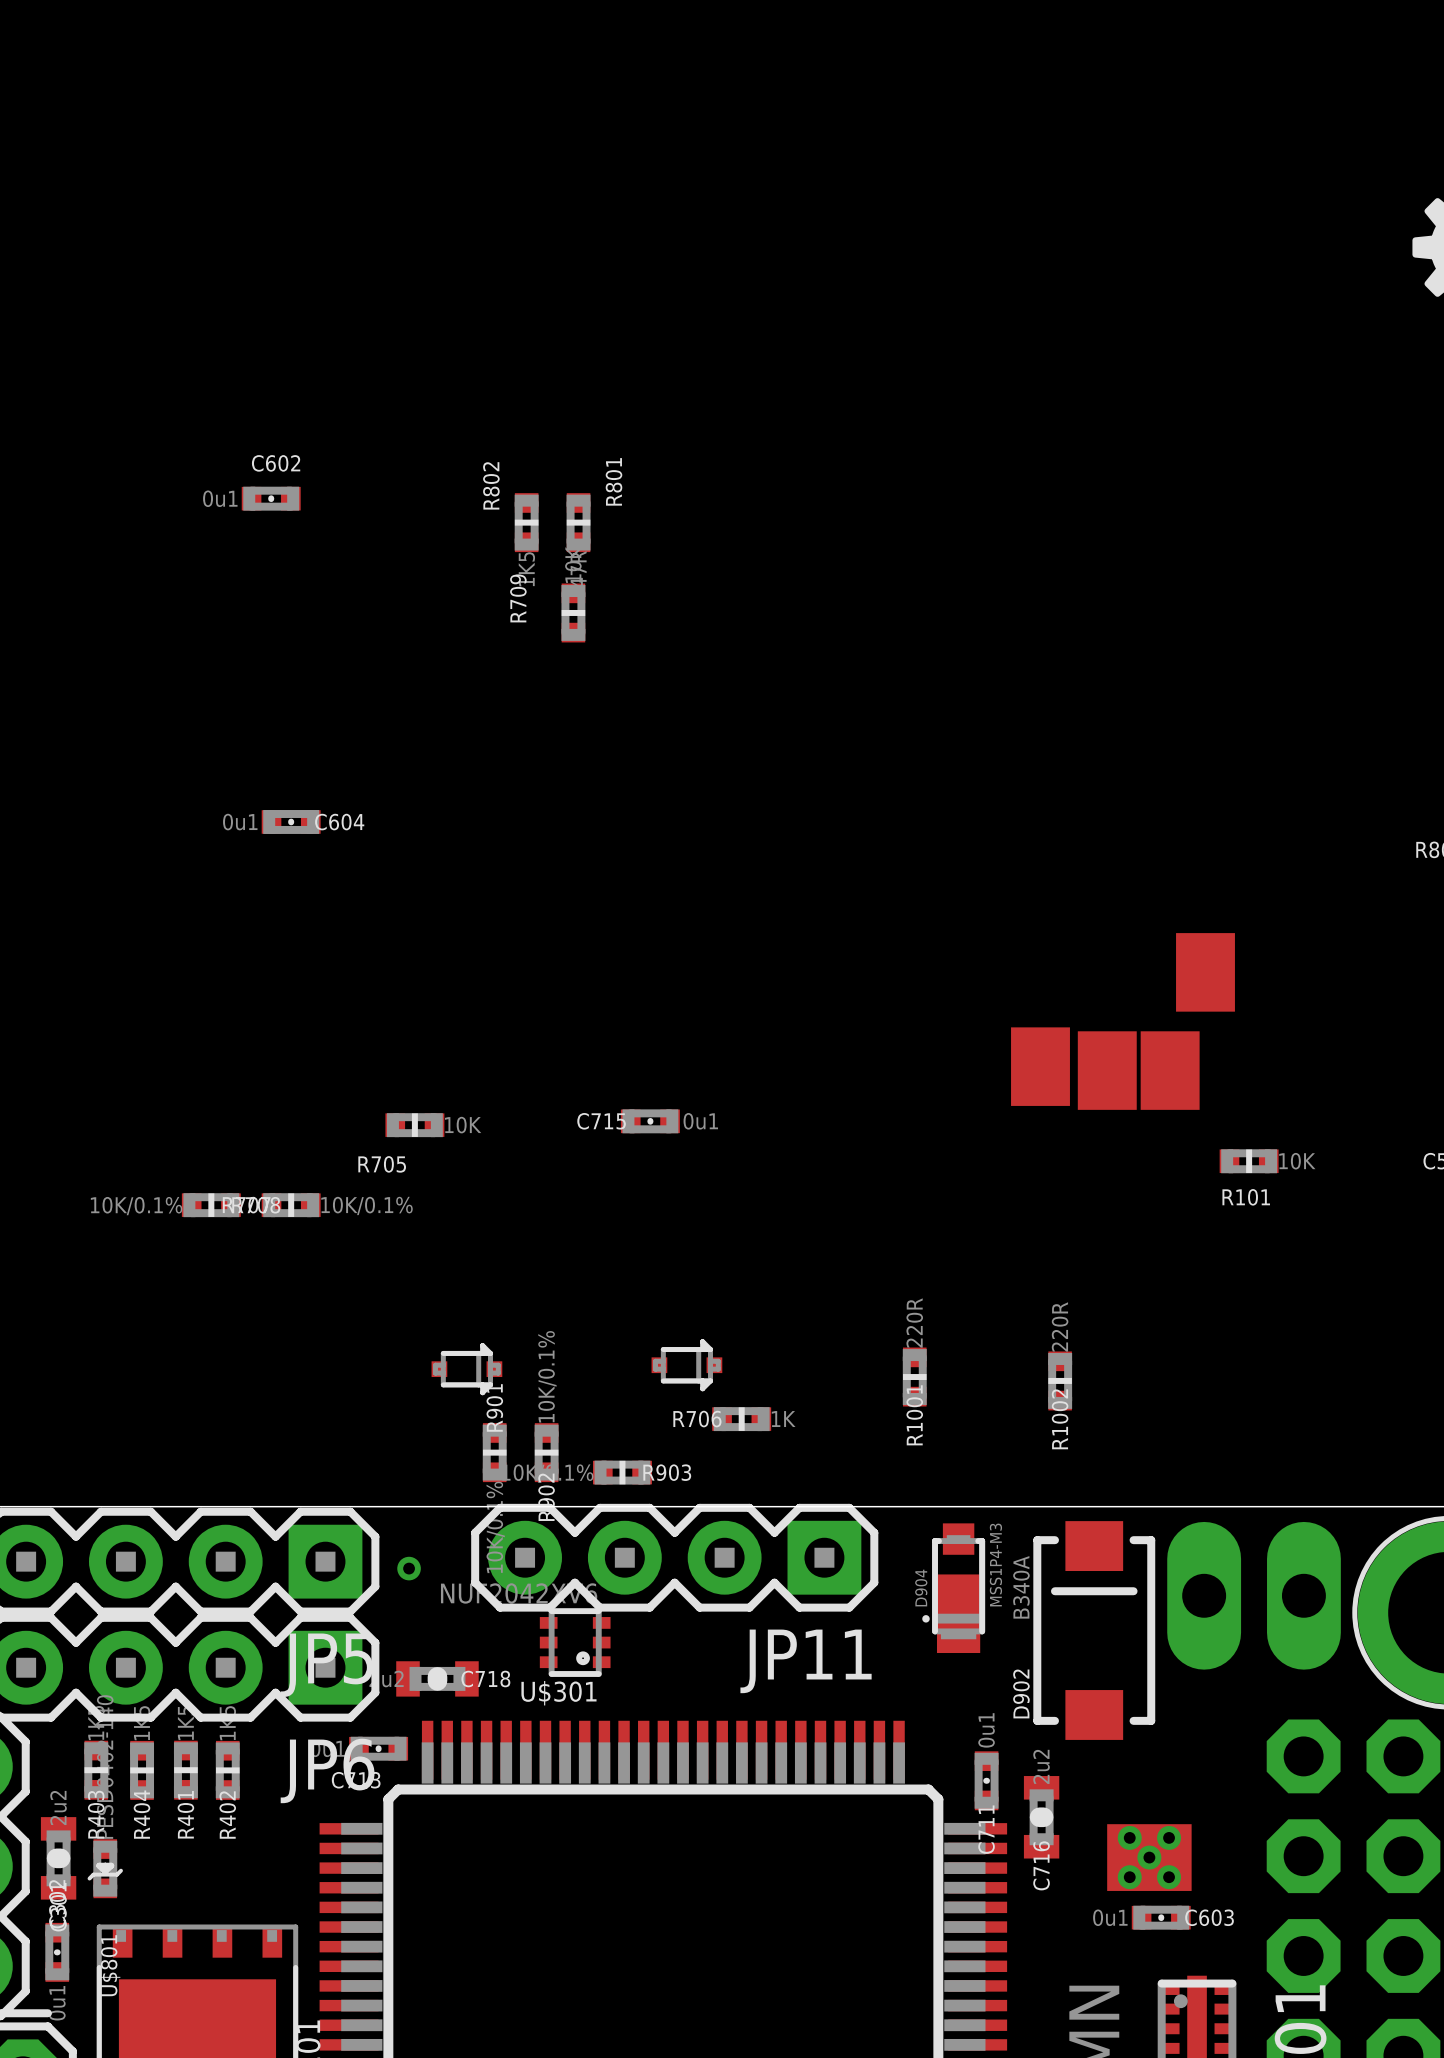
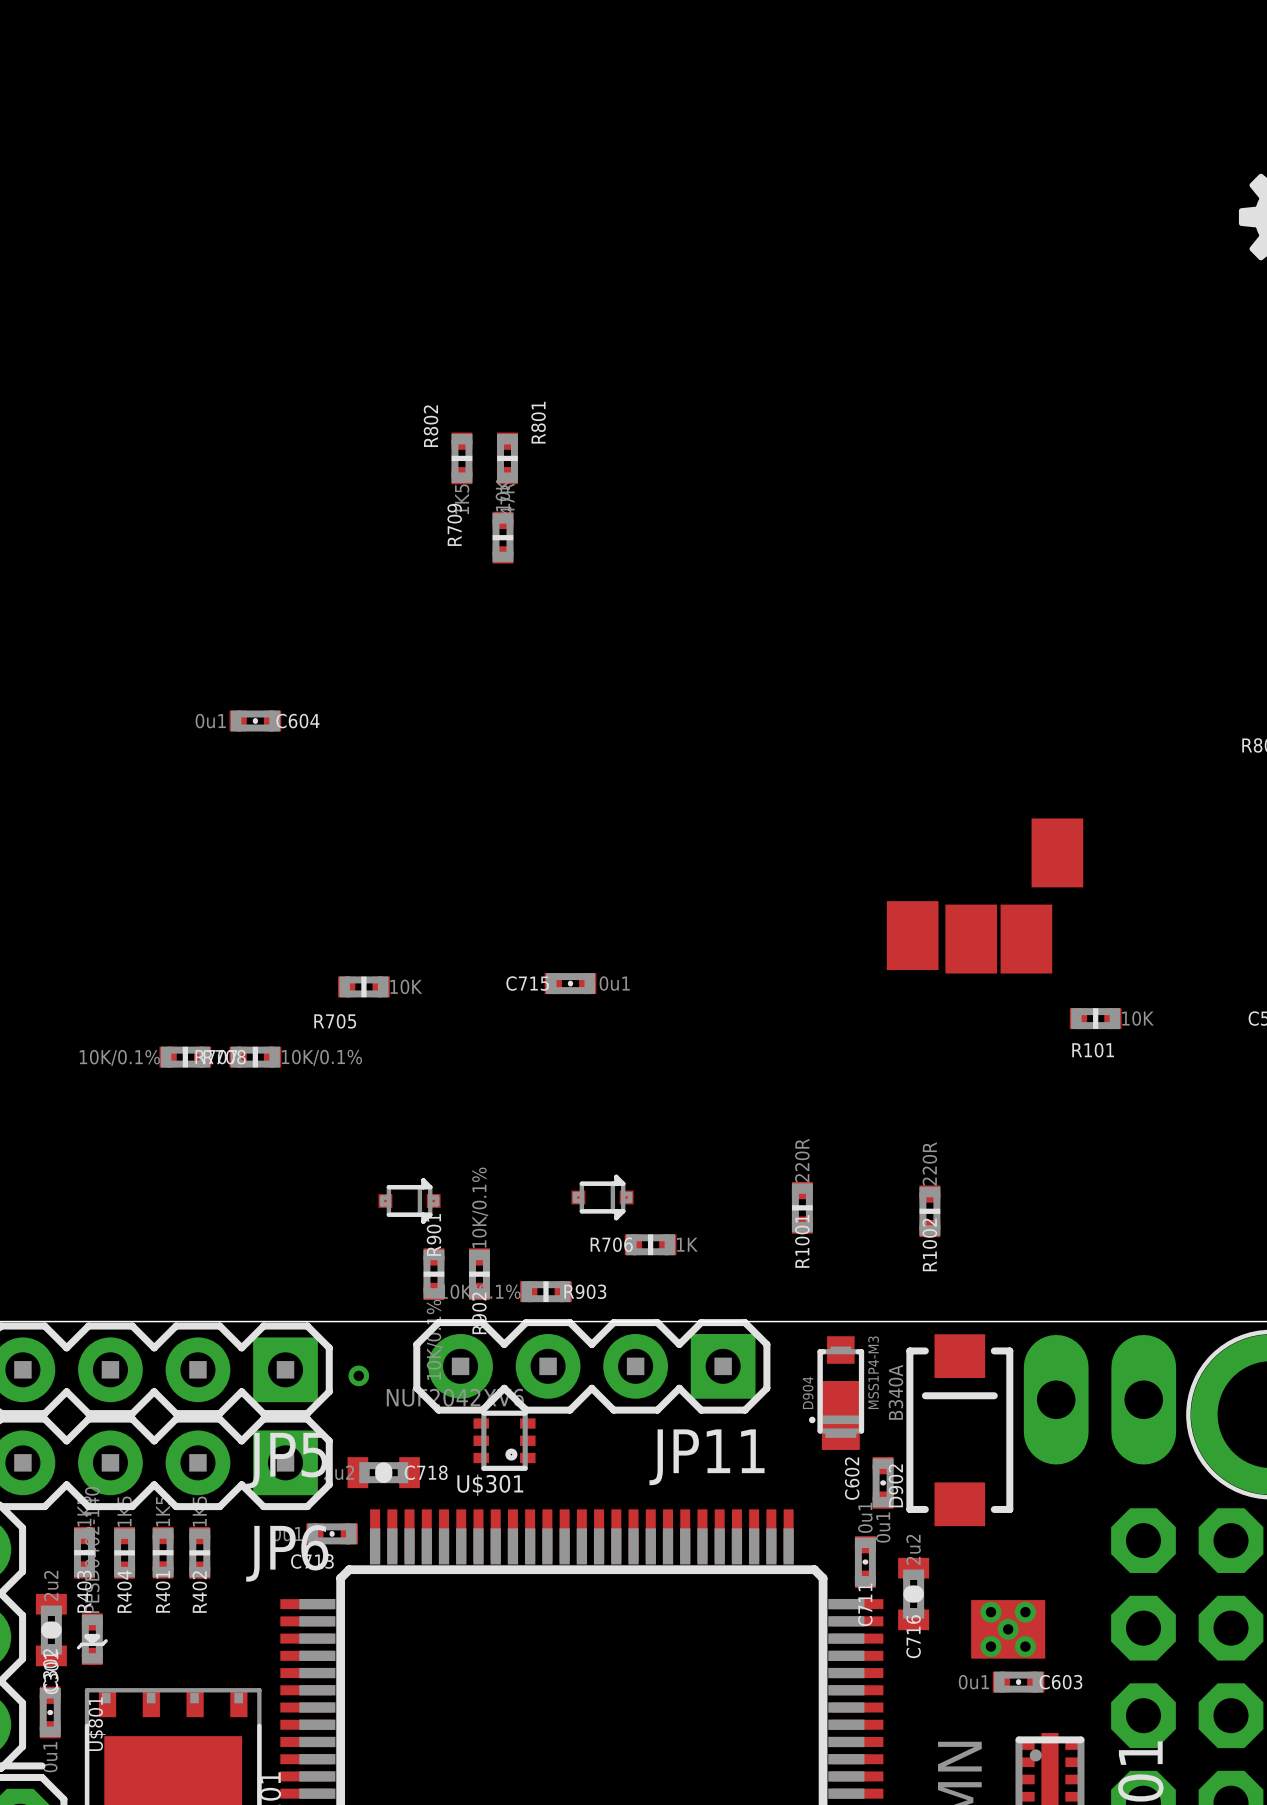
C602 value position: 0u1 (220, 498) -> 0u1 (883, 1527)
C602 rotation: 0° (271, 498) -> 90° clockwise (883, 1482)
C602 position: (271, 498) -> (883, 1482)

